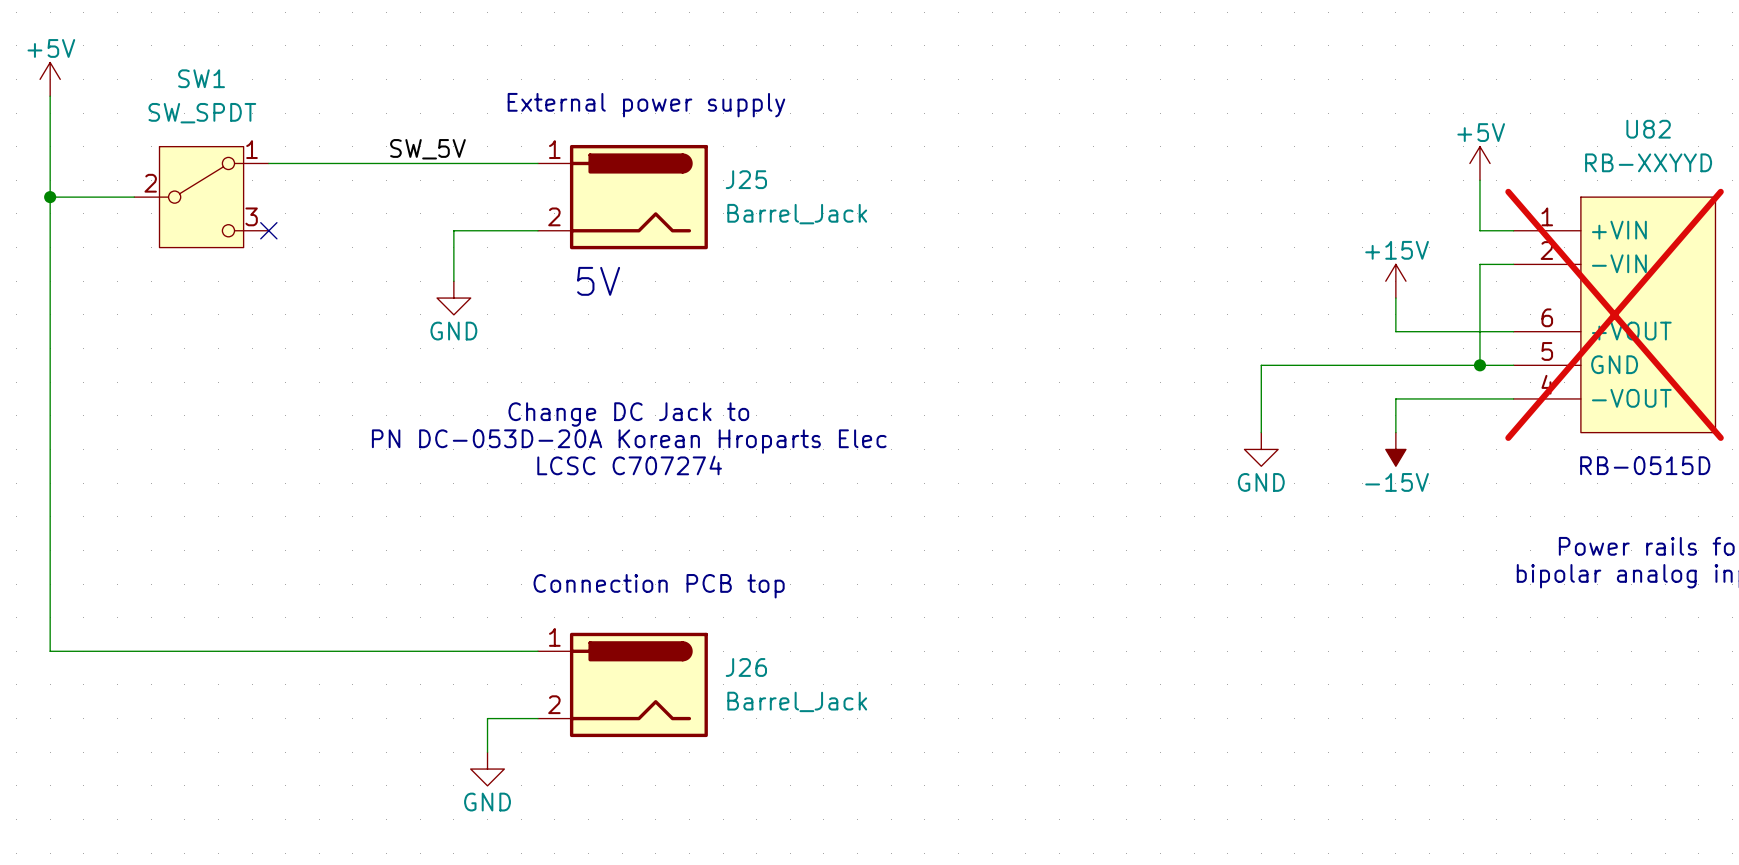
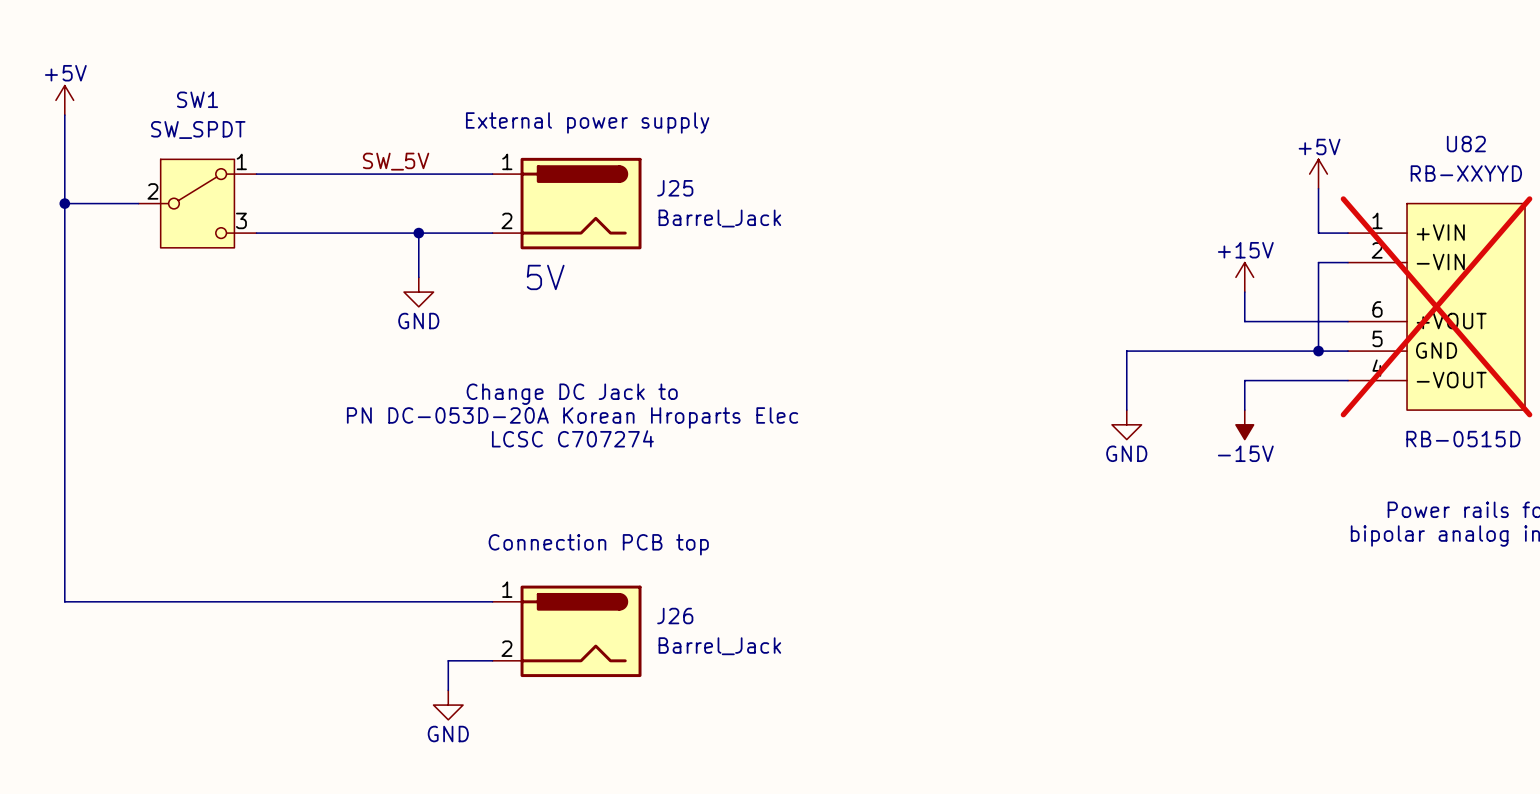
wire: none -> (256, 233) (418, 233)
no-connect mark: (268, 230) -> none
junction: none -> (418, 233)

